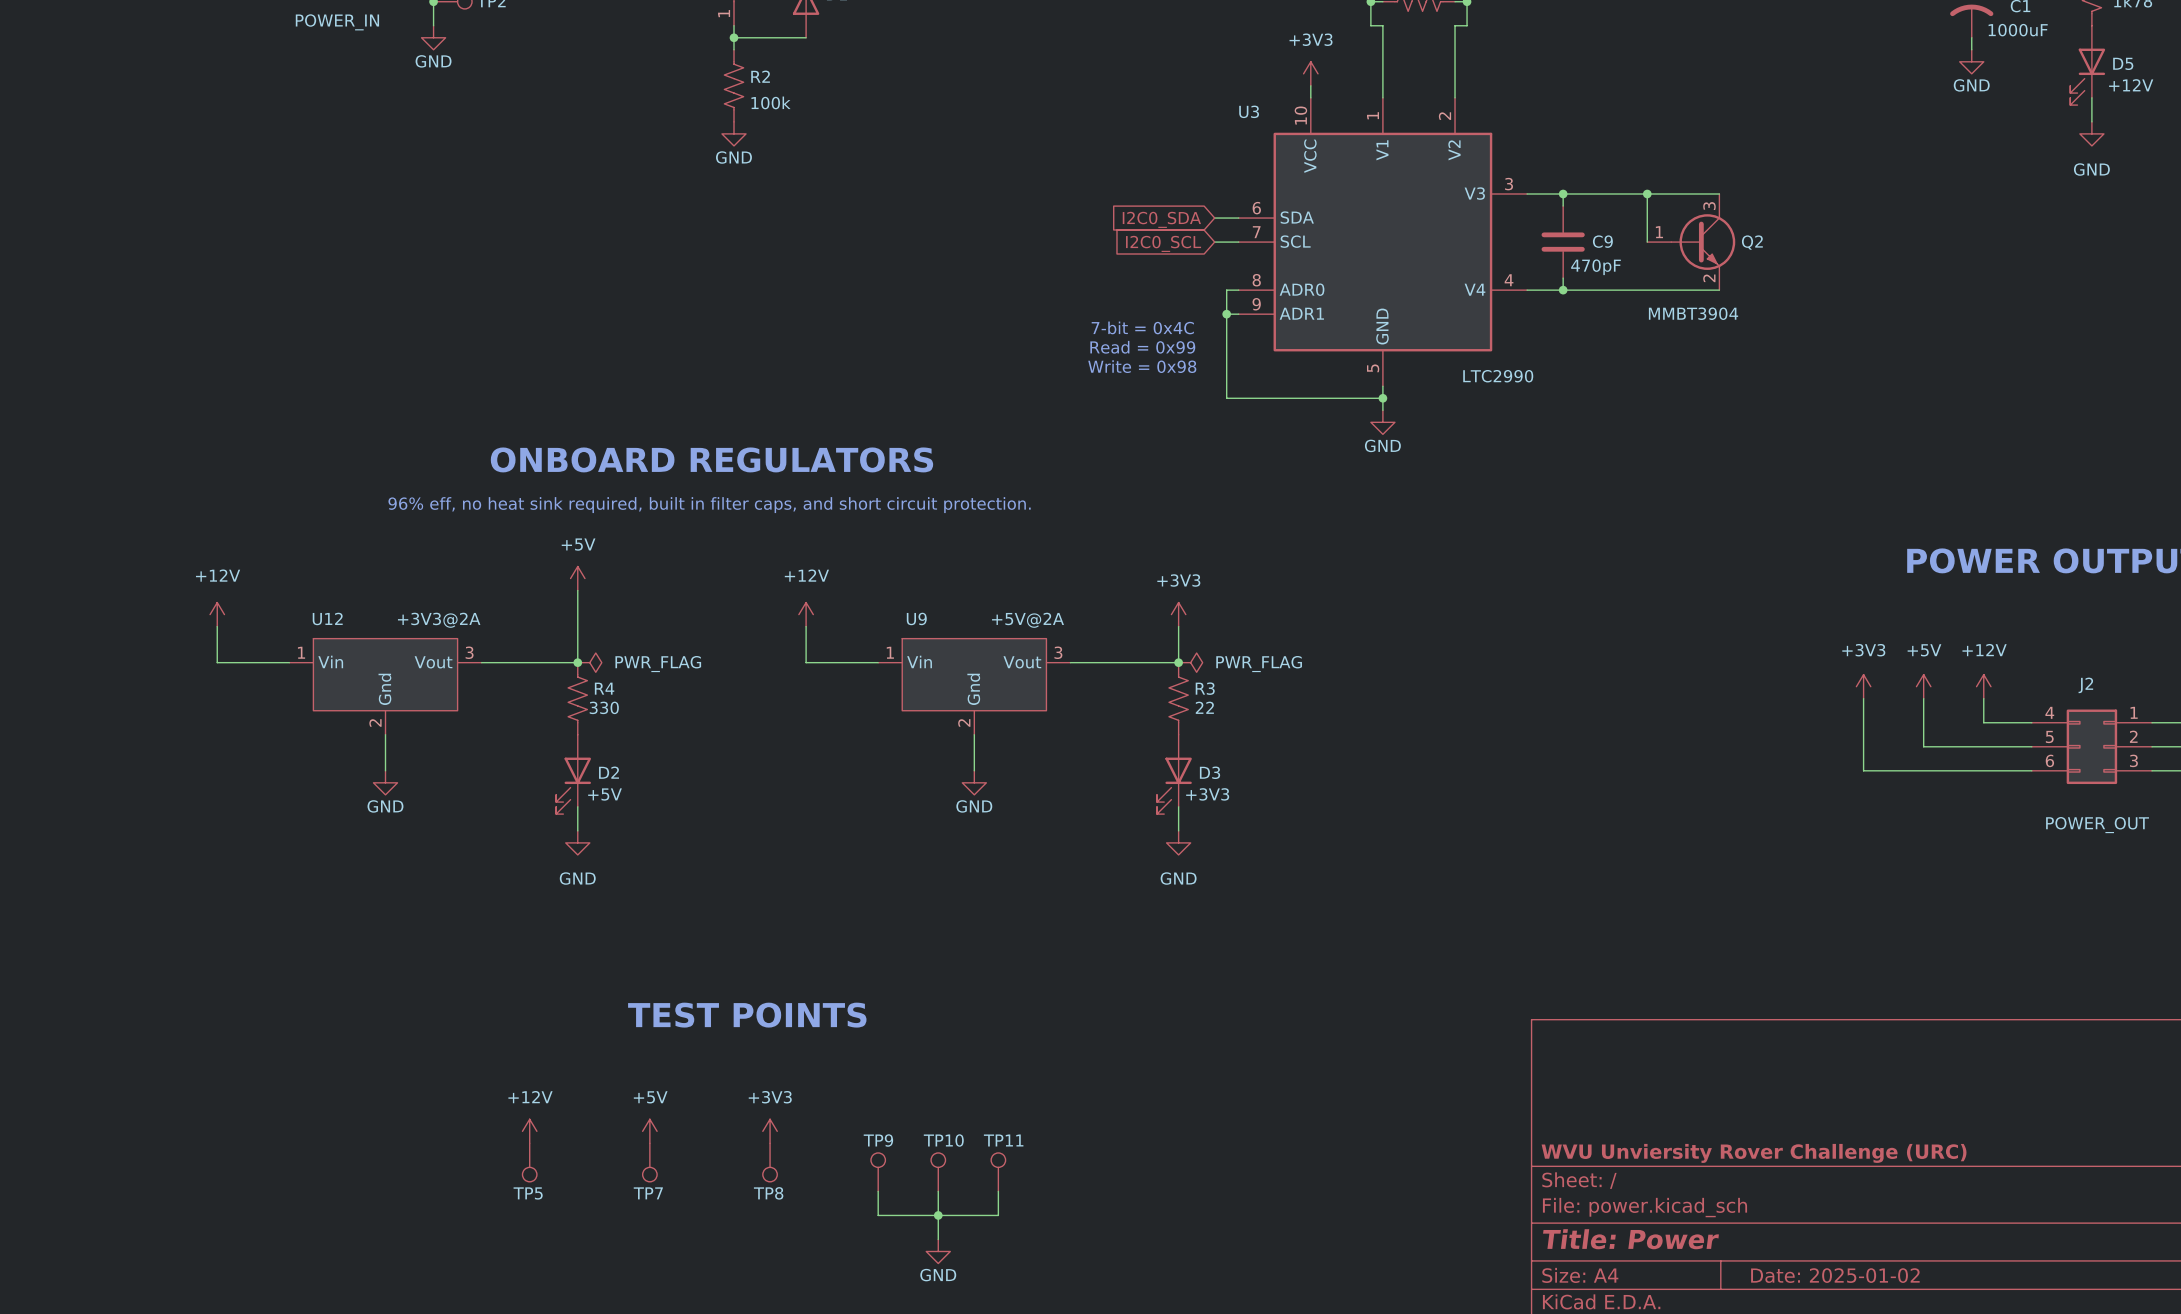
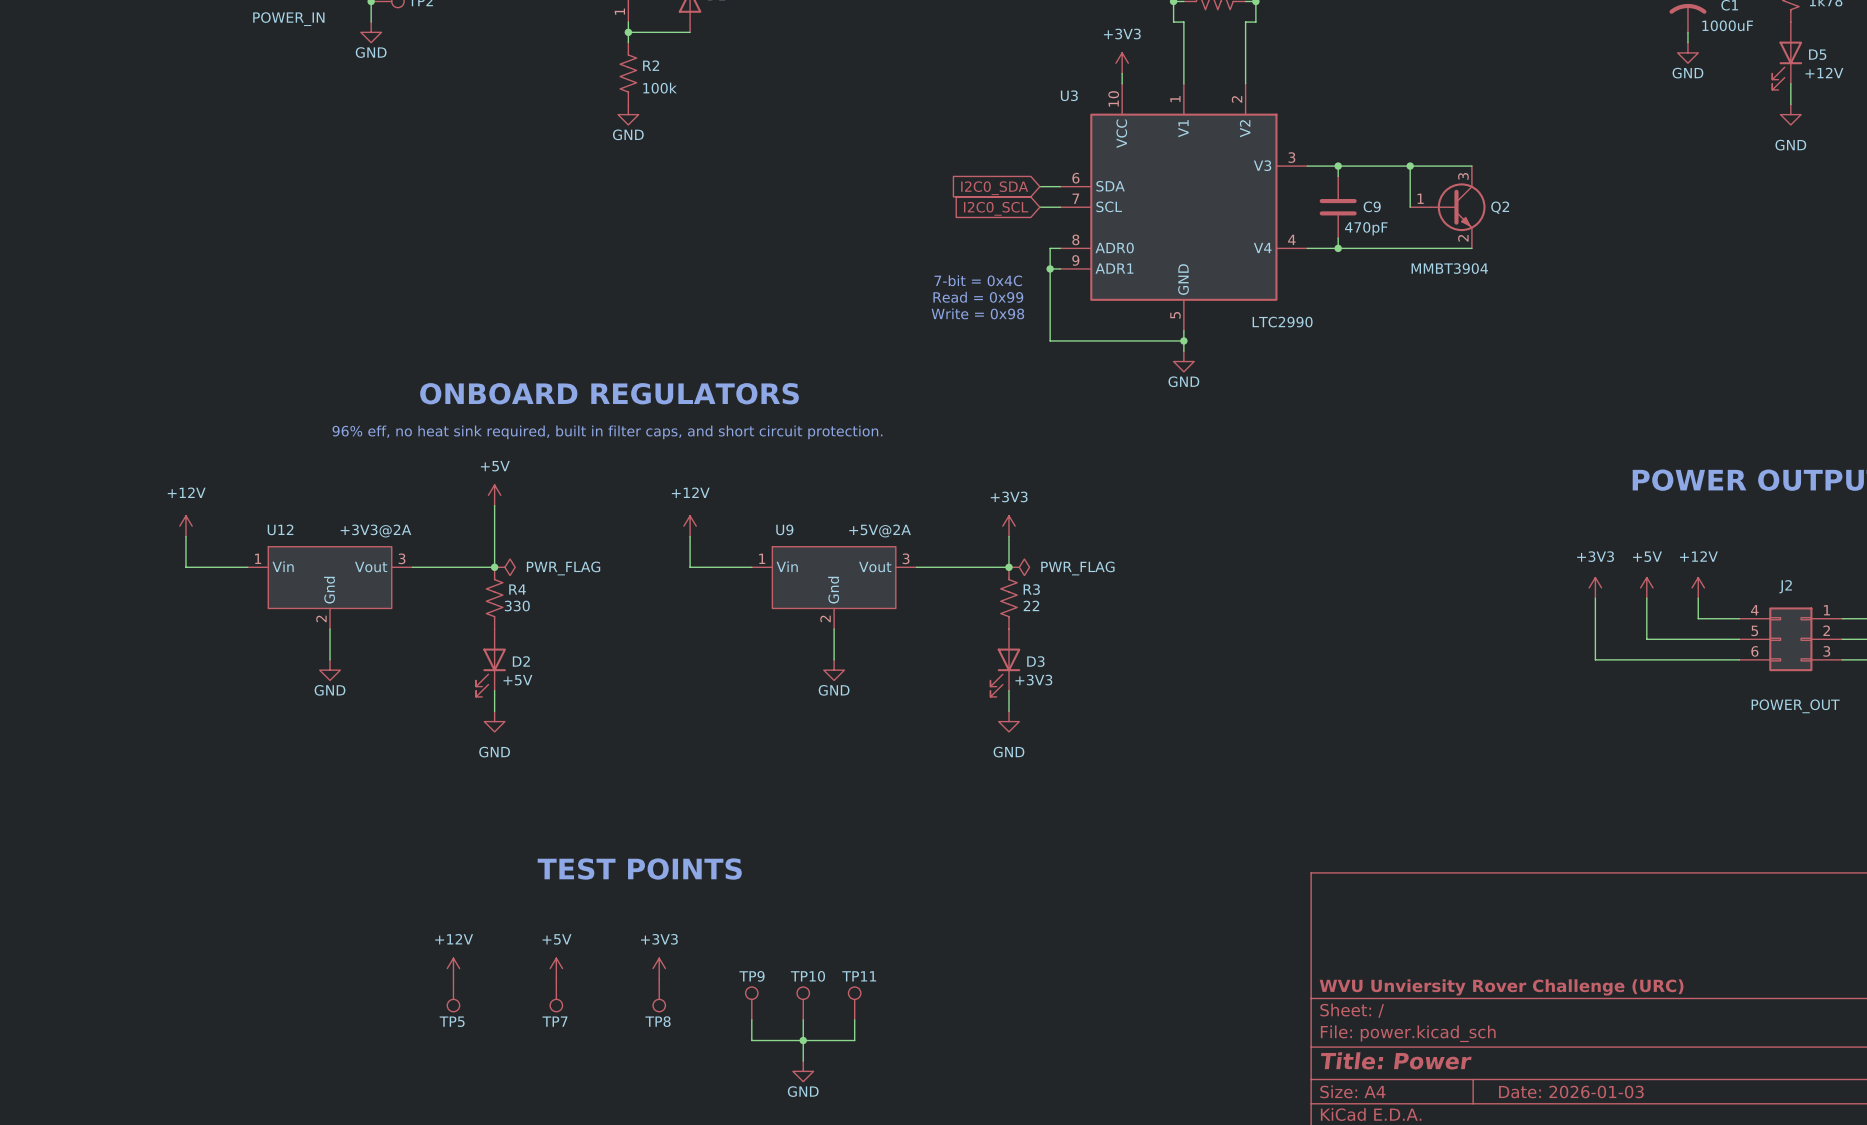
title block: Date: 2025-01-02 (1835, 1275) -> Date: 2026-01-03 (1571, 1091)

